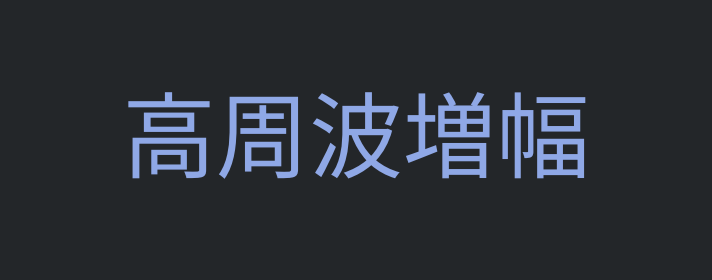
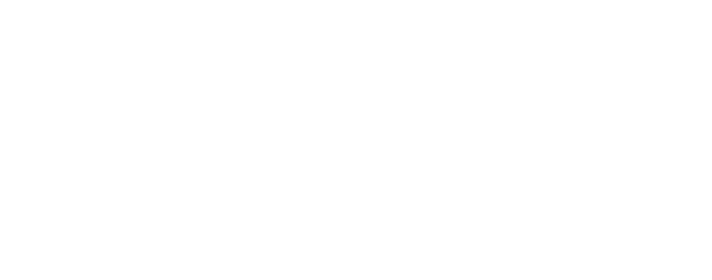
text: 高周波増幅 (356, 135) -> none

